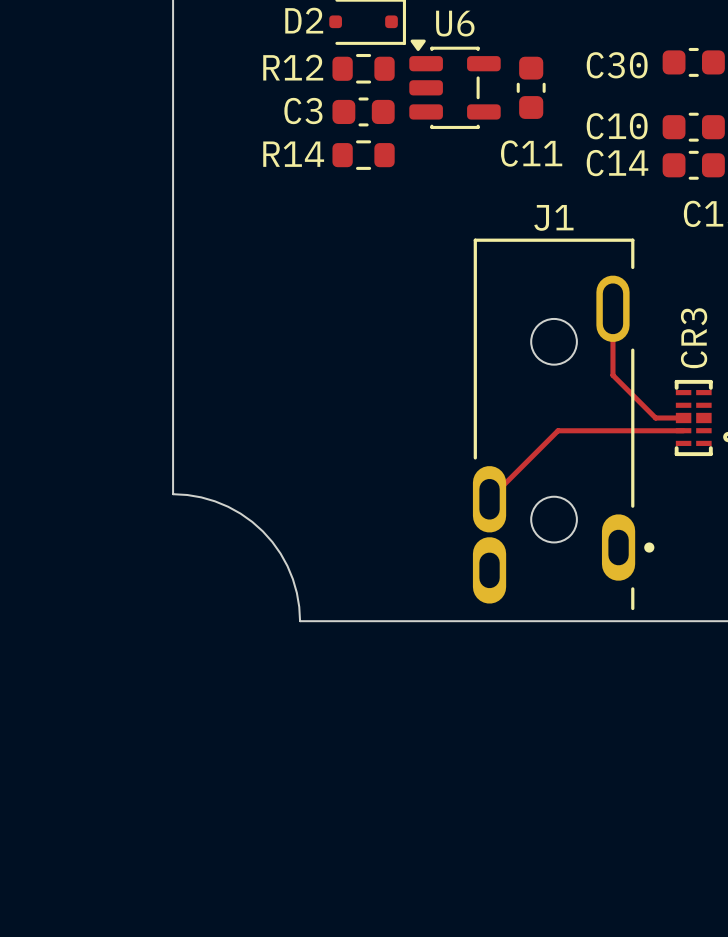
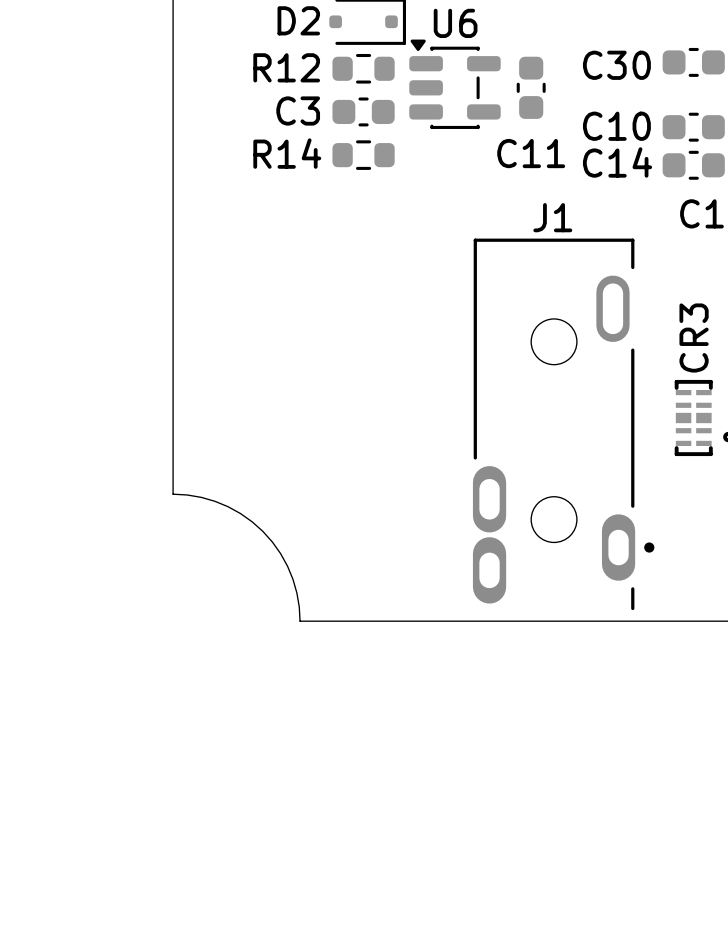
track: (612, 308) (612, 375) (655, 418) (683, 418) -> none
track: (683, 430) (558, 430) (489, 499) -> none

